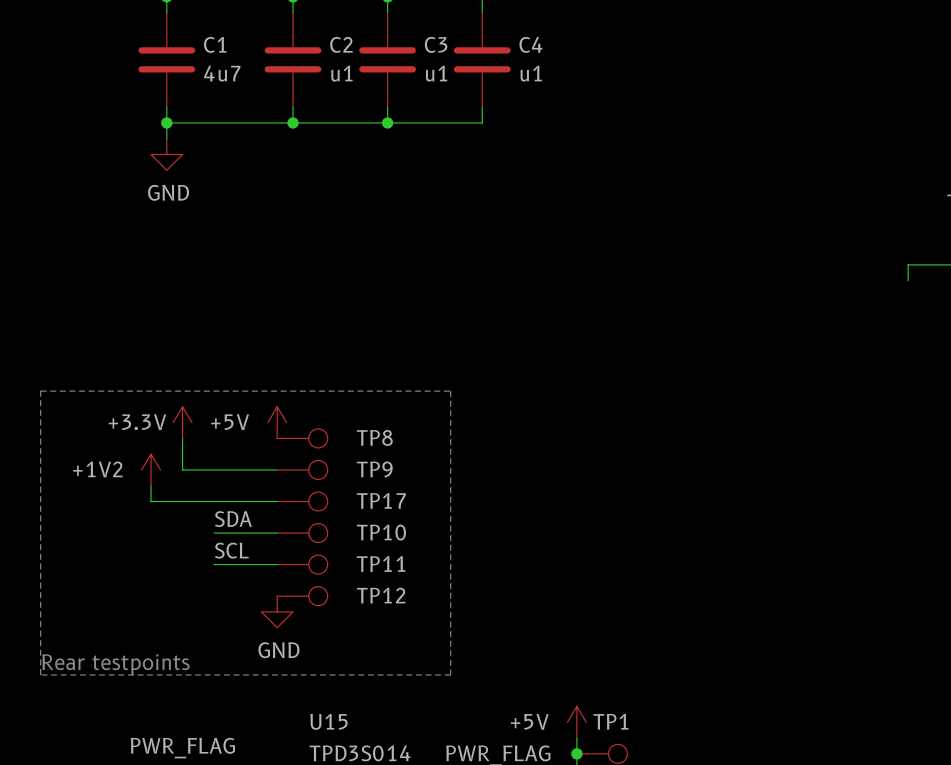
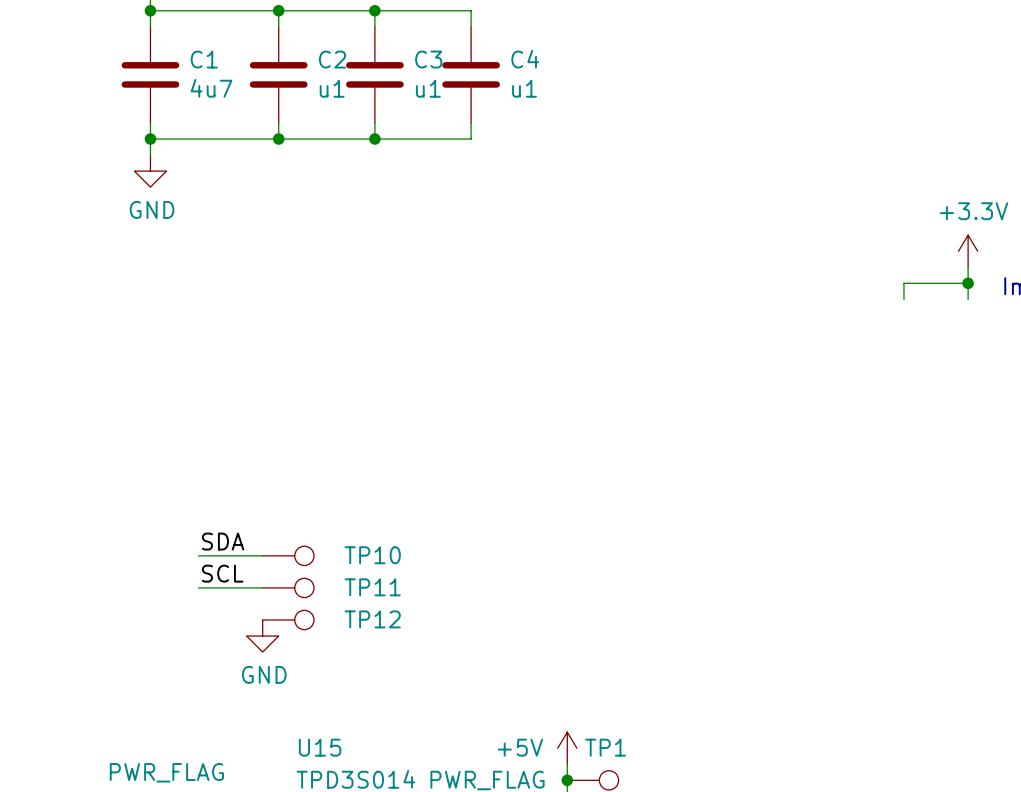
line: (40, 391) (450, 391) (450, 675) (40, 675) (40, 391) -> none
power symbol: +3.3V (182, 422) -> none
power symbol: +5V (277, 422) -> none
wire: (182, 438) (182, 469) (277, 469) -> none
TP8: (302, 438) -> none
power symbol: +1V2 (151, 469) -> none
TP9: (302, 469) -> none
wire: (151, 485) (151, 501) (277, 501) -> none
TP17: (302, 501) -> none
text: Rear testpoints (115, 664) -> none

